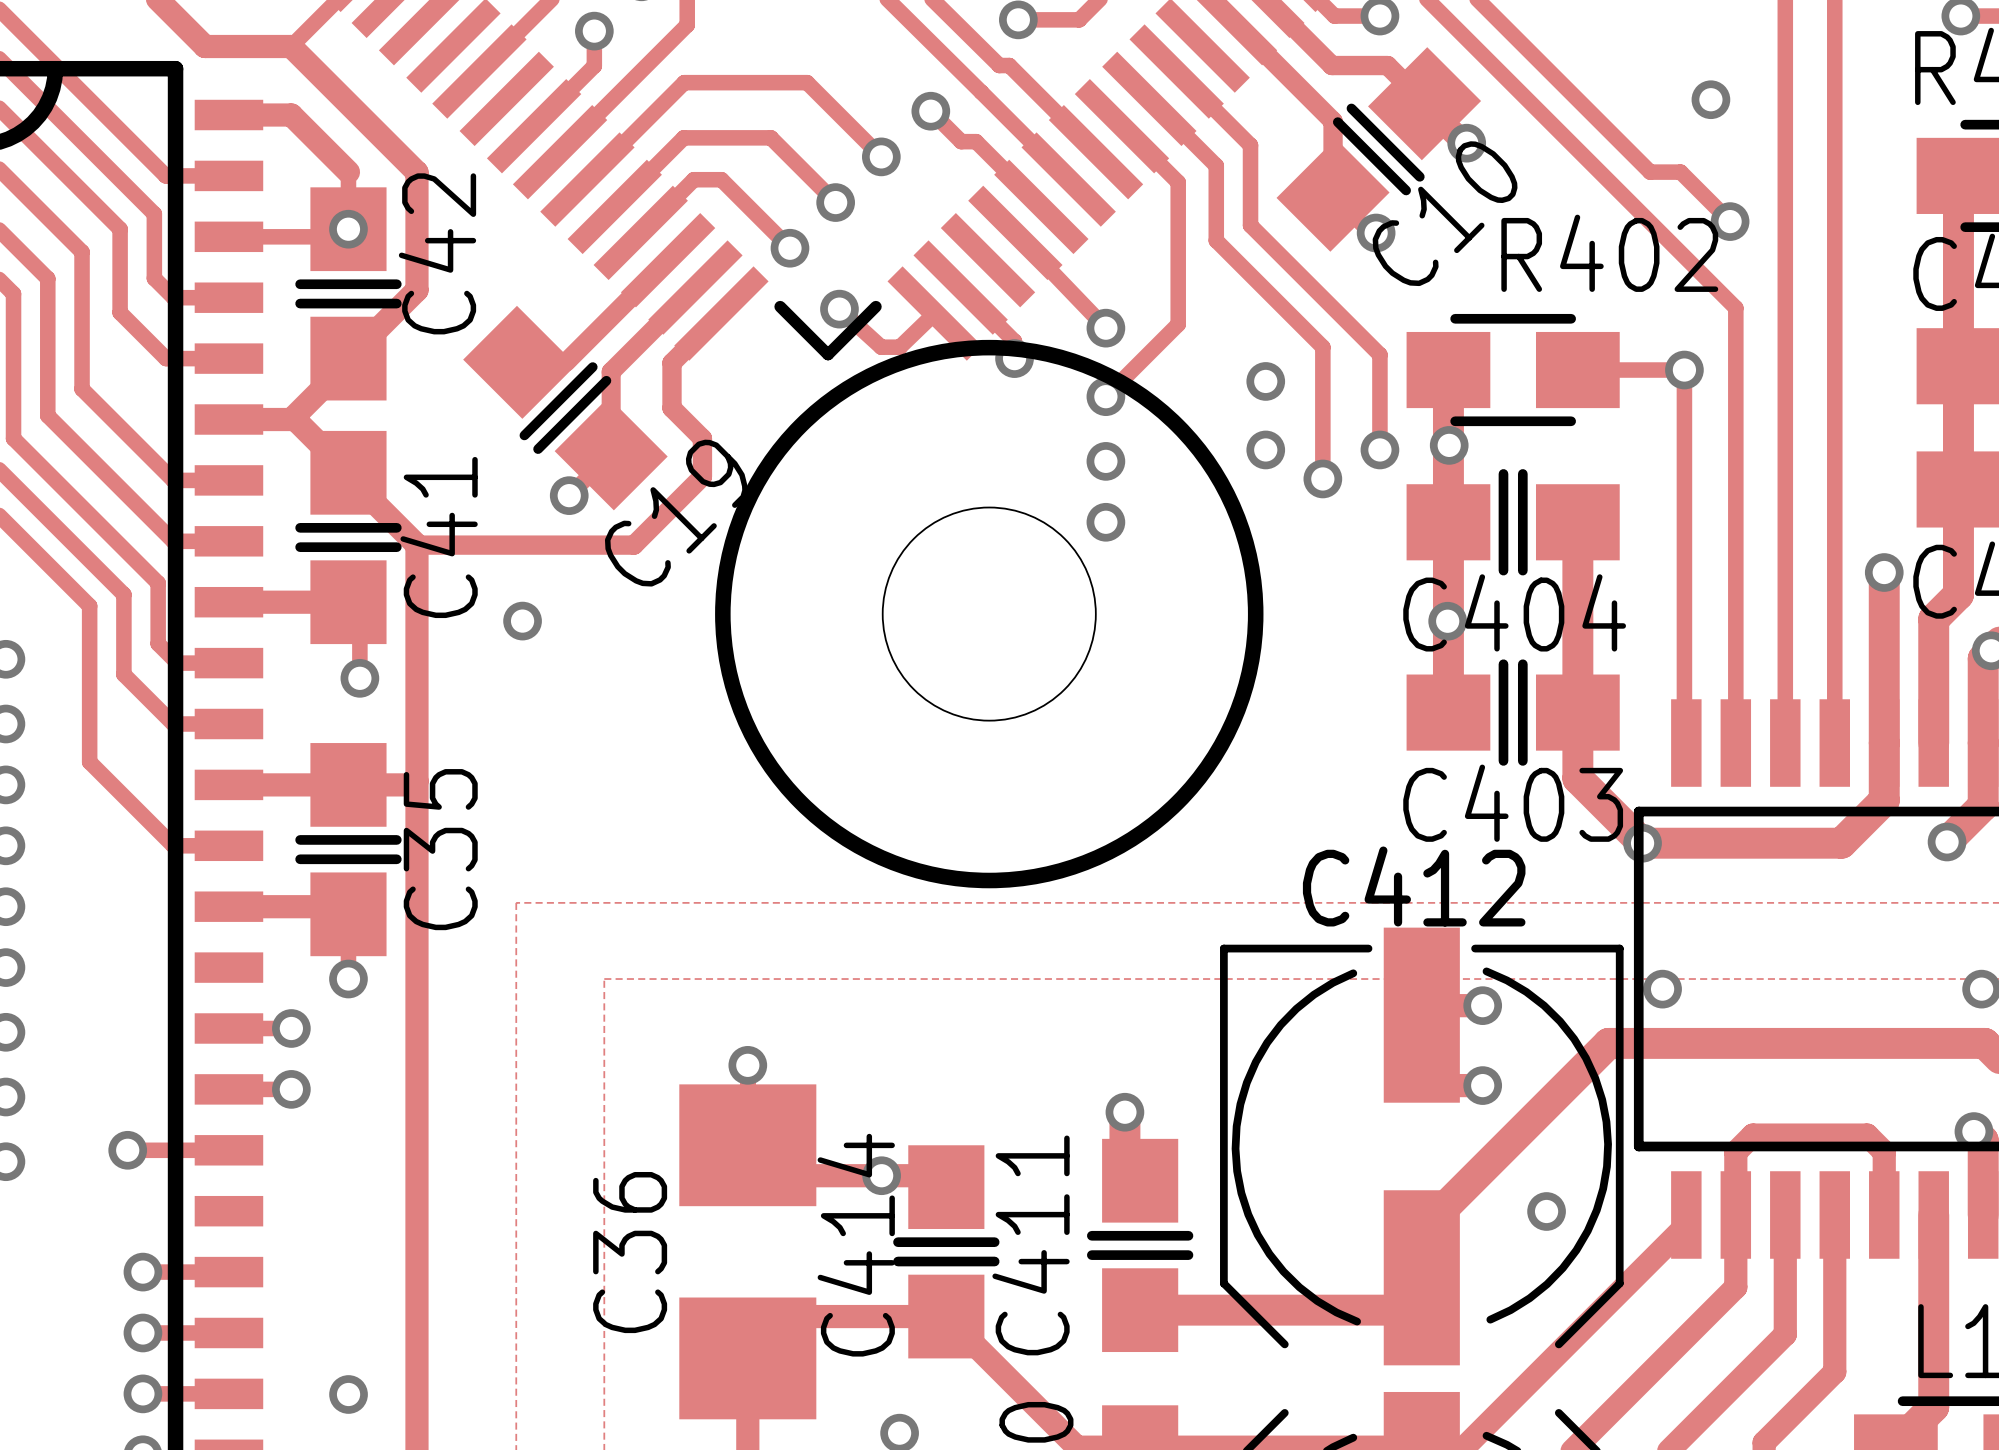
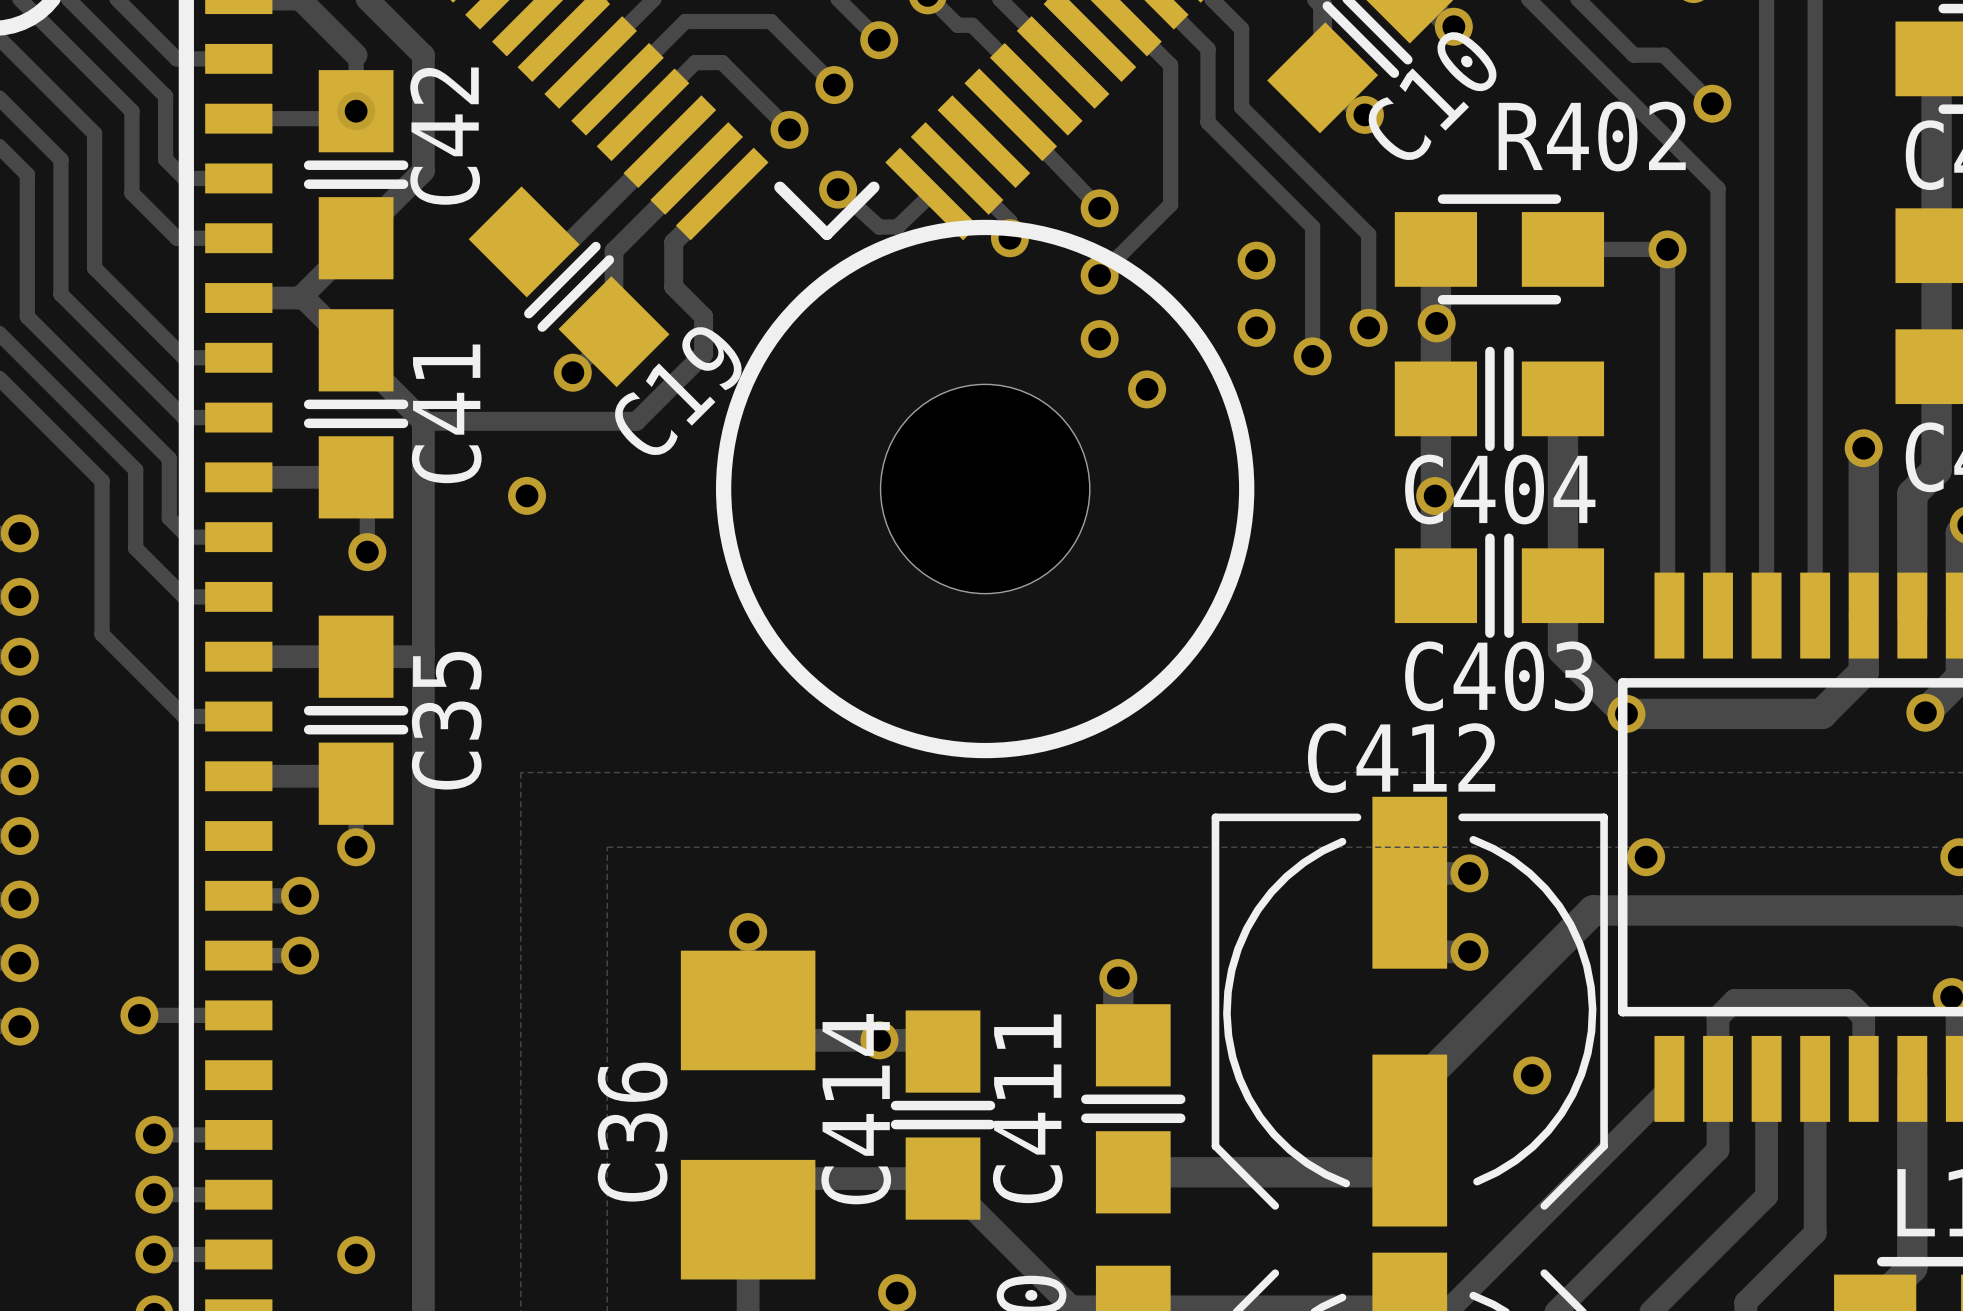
via position: (1105, 522) -> (1147, 389)

